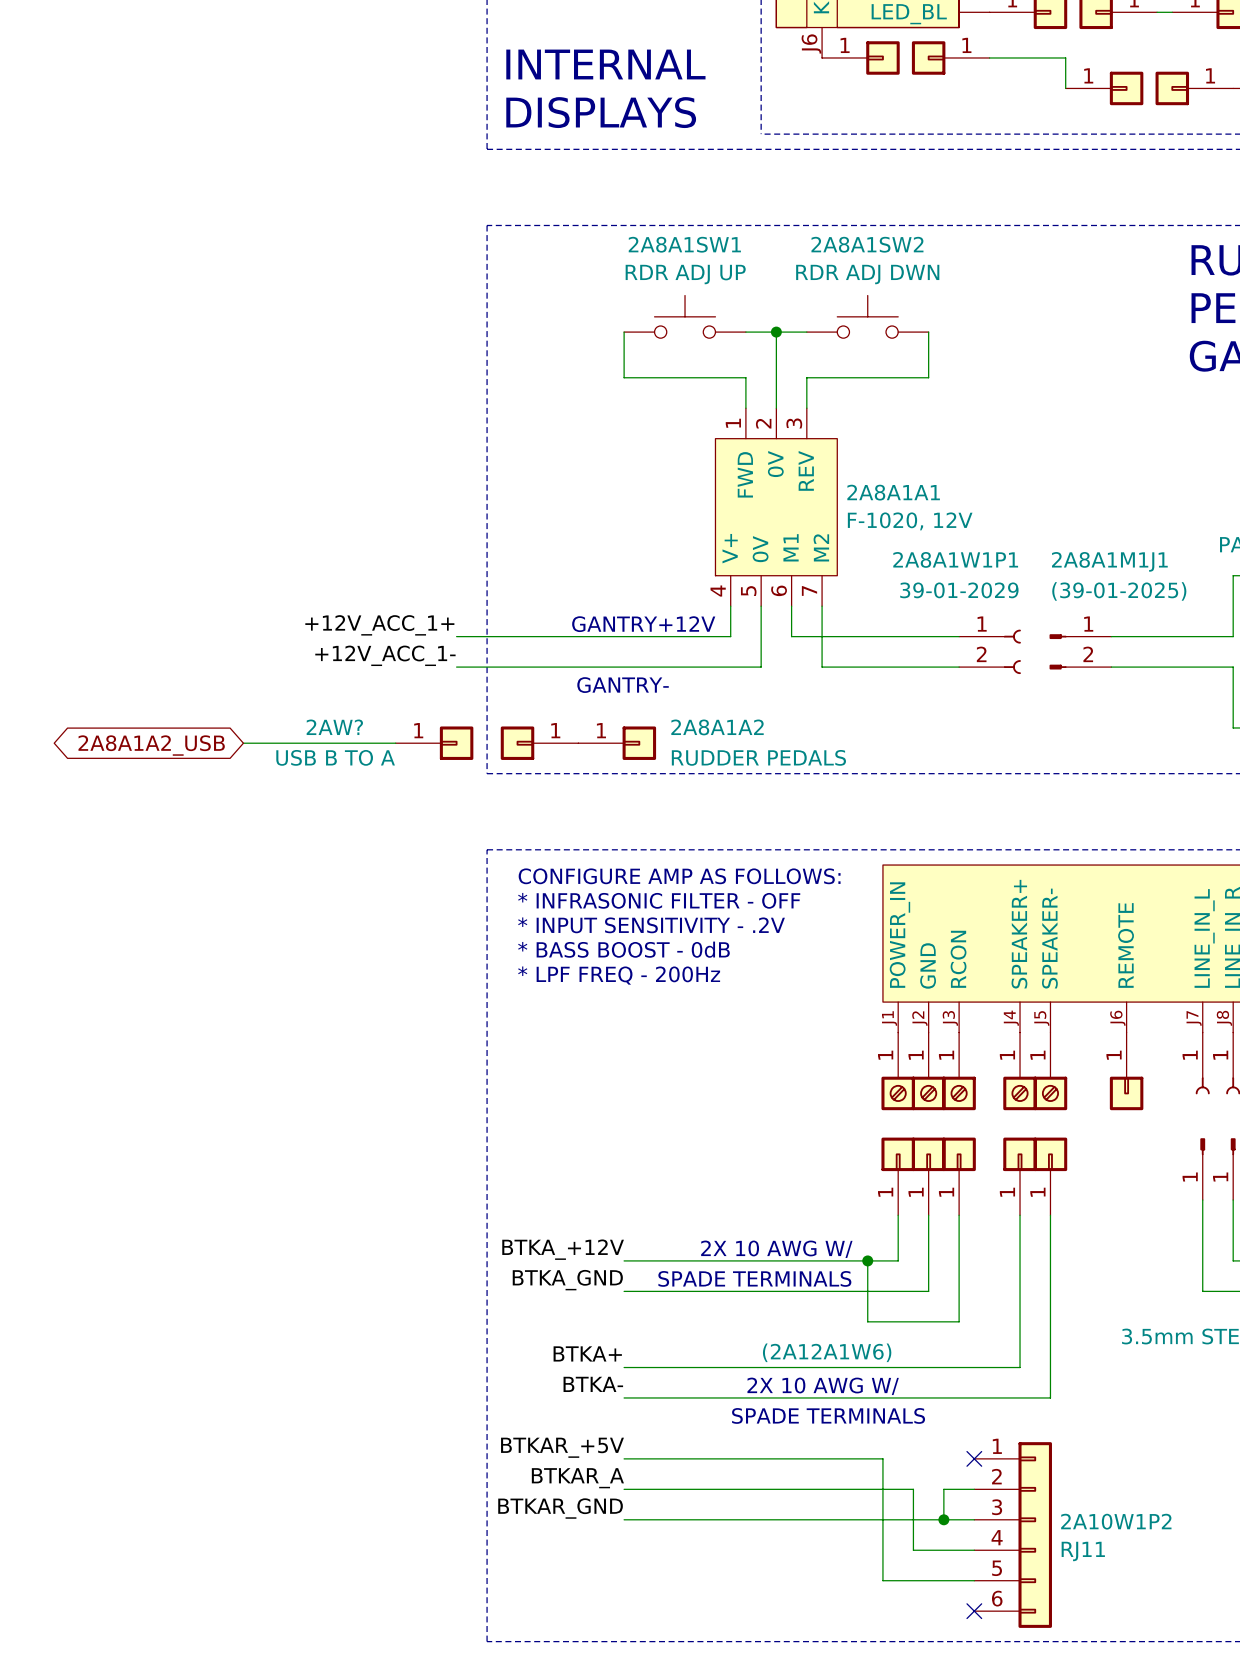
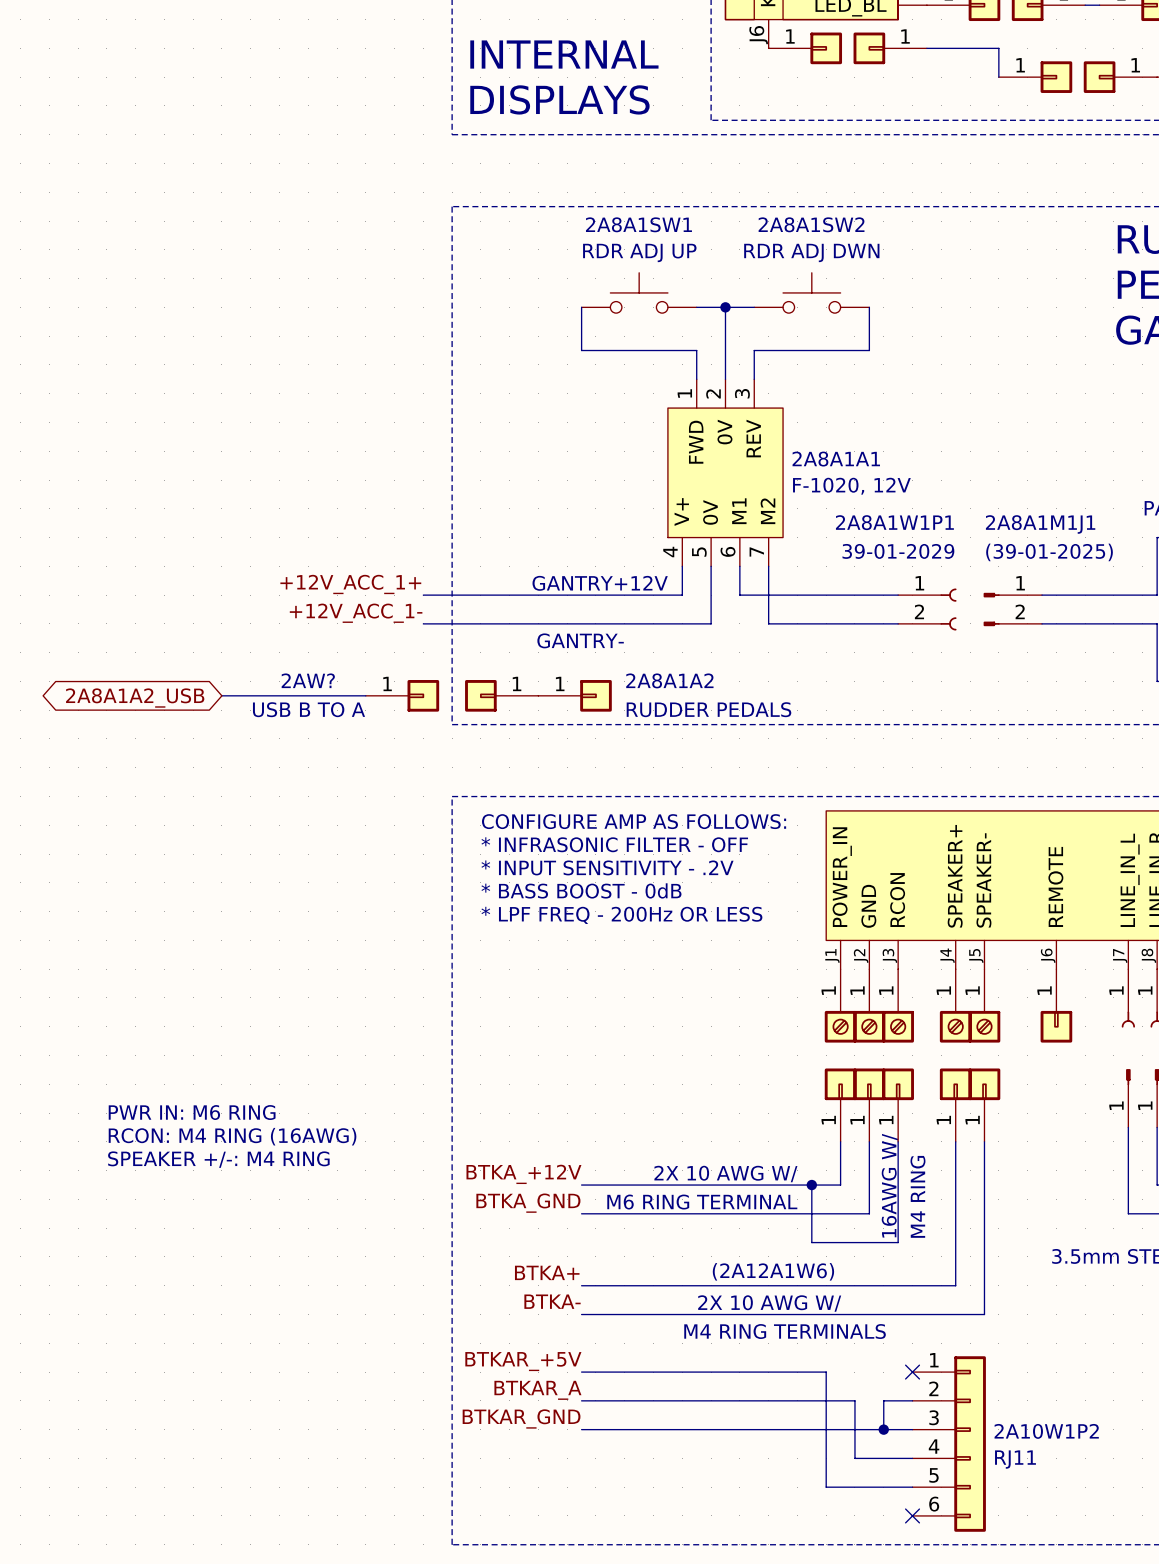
text: * LPF FREQ - 200Hz (619, 975) -> * LPF FREQ - 200Hz OR LESS (621, 915)
text: none -> PWR IN: M6 RING (192, 1112)
text: none -> RCON: M4 RING (16AWG) (232, 1136)
text: none -> SPEAKER +/-: M4 RING (218, 1159)
text: none -> 16AWG W/ (889, 1185)
text: none -> M4 RING (917, 1196)
text: SPADE TERMINALS (754, 1278) -> M6 RING TERMINAL (702, 1202)
text: SPADE TERMINALS (828, 1415) -> M4 RING TERMINALS (785, 1331)

